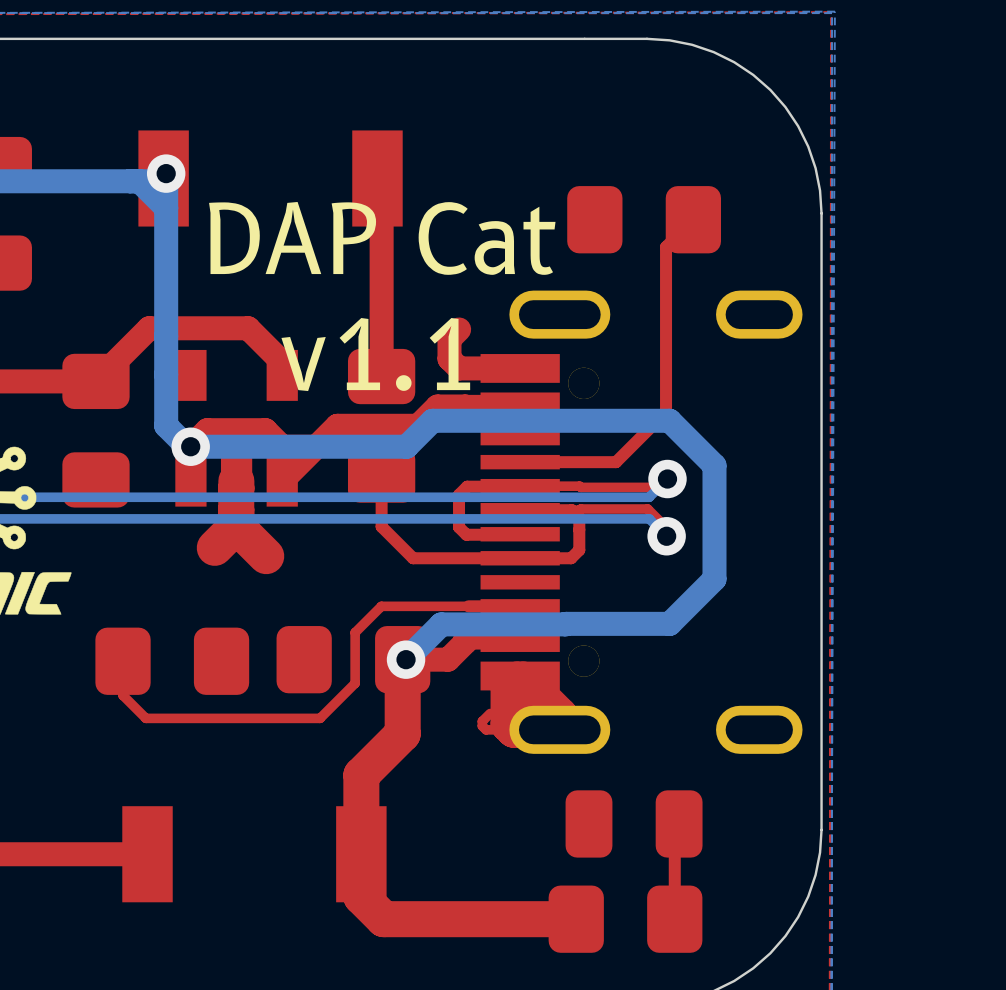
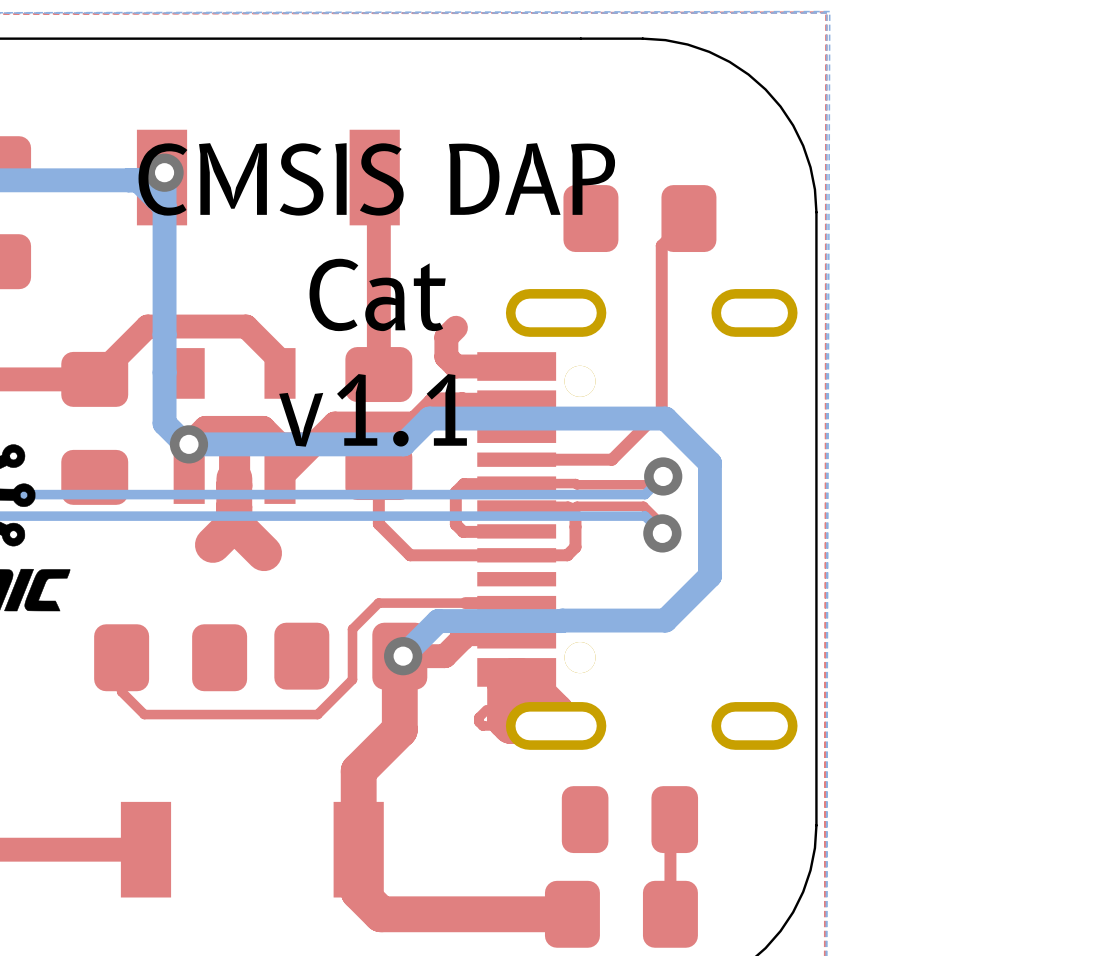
text: none -> CMSIS DAP (376, 179)
text: DAP Cat (382, 238) -> none
text: none -> Cat (377, 294)
text position: v1.1 (375, 354) -> v1.1 (373, 410)

